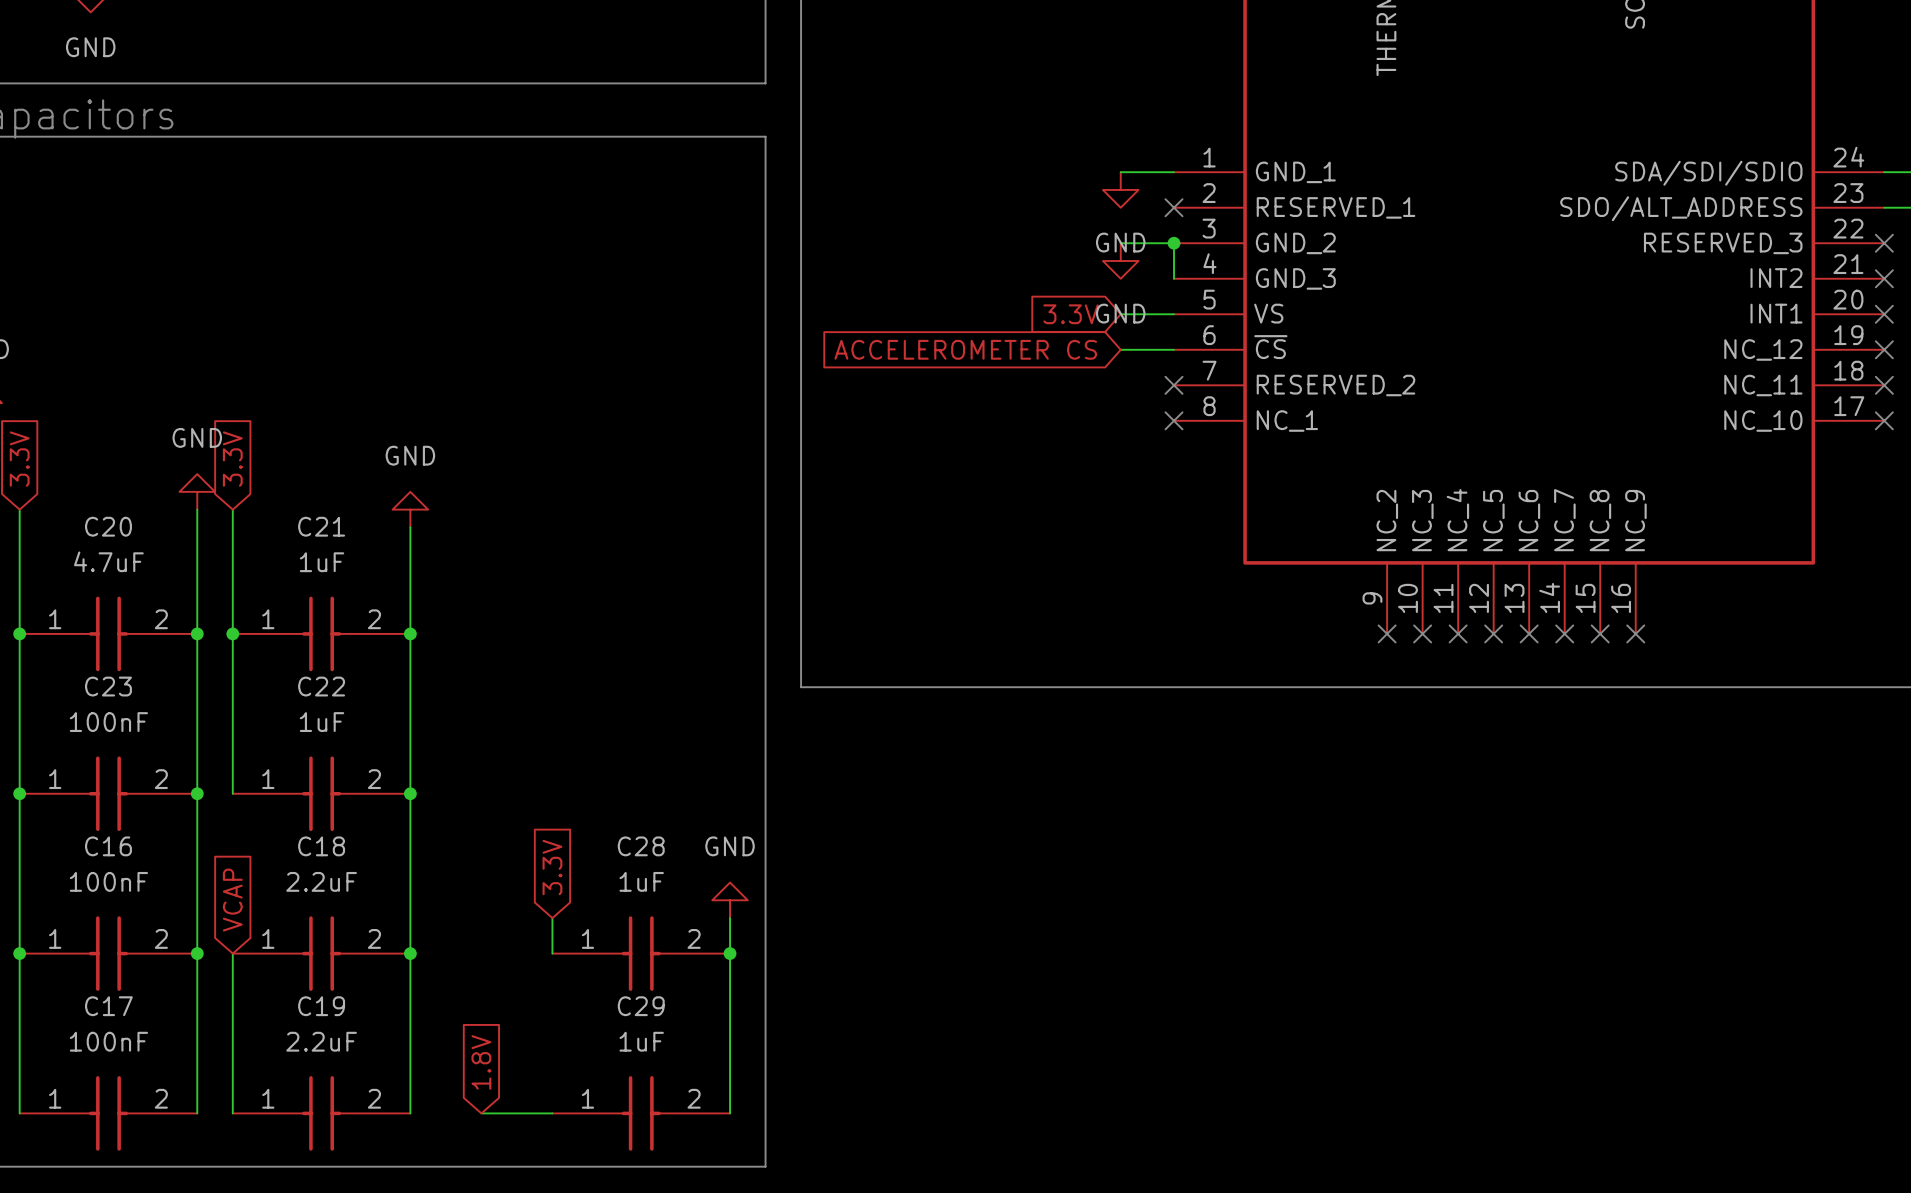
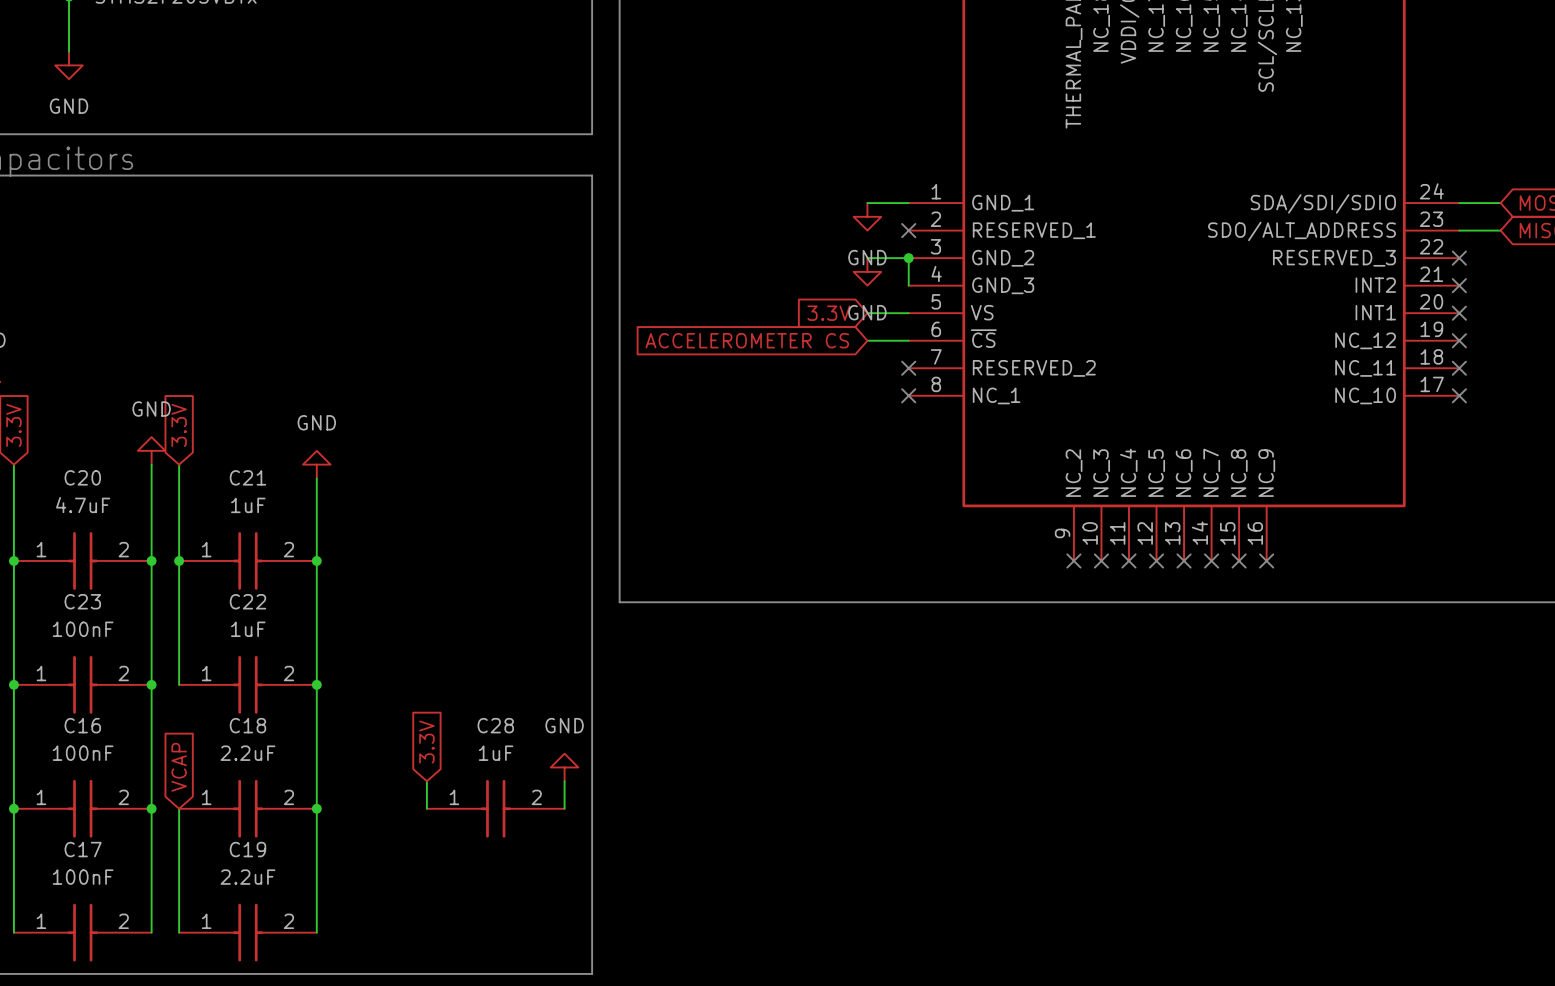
wire: (730, 953) (730, 1113) -> none
junction: (730, 953) -> none
global label: 1.8V (481, 1062) -> none
wire: (481, 1113) (552, 1113) -> none
C29: 1uF (641, 1113) -> none

